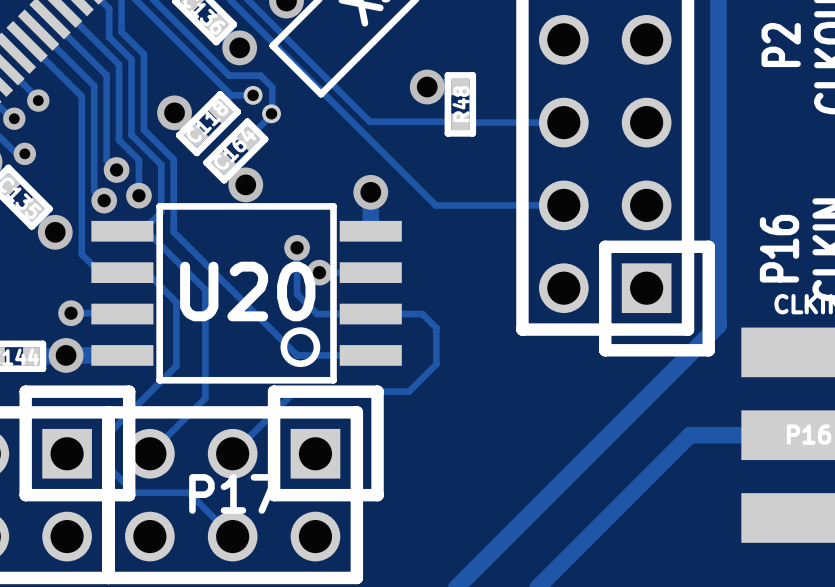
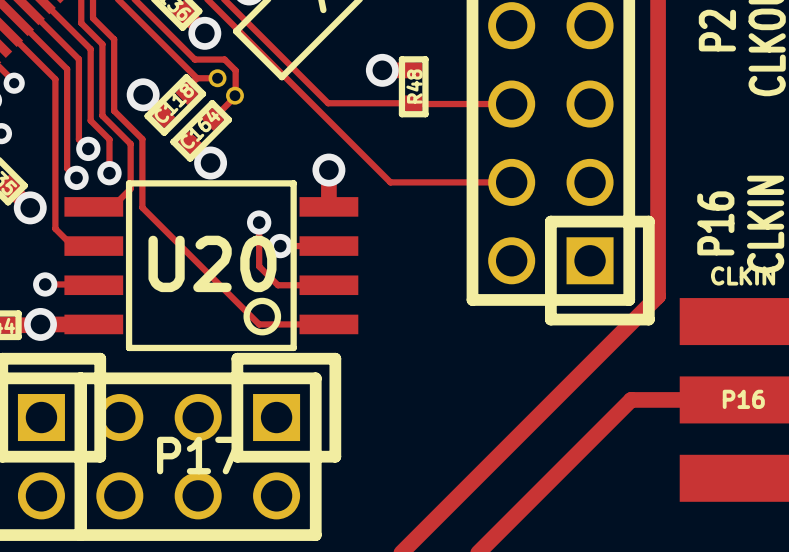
track: (142, 231) (146, 231) (205, 289) (205, 398) (149, 453) -> none
track: (122, 272) (146, 272) (176, 302) (176, 366) (108, 433) (108, 467) (134, 492) (188, 492) (232, 536) -> none
track: (370, 314) (422, 314) (436, 327) (436, 364) (409, 391) (294, 391) (232, 453) -> none

